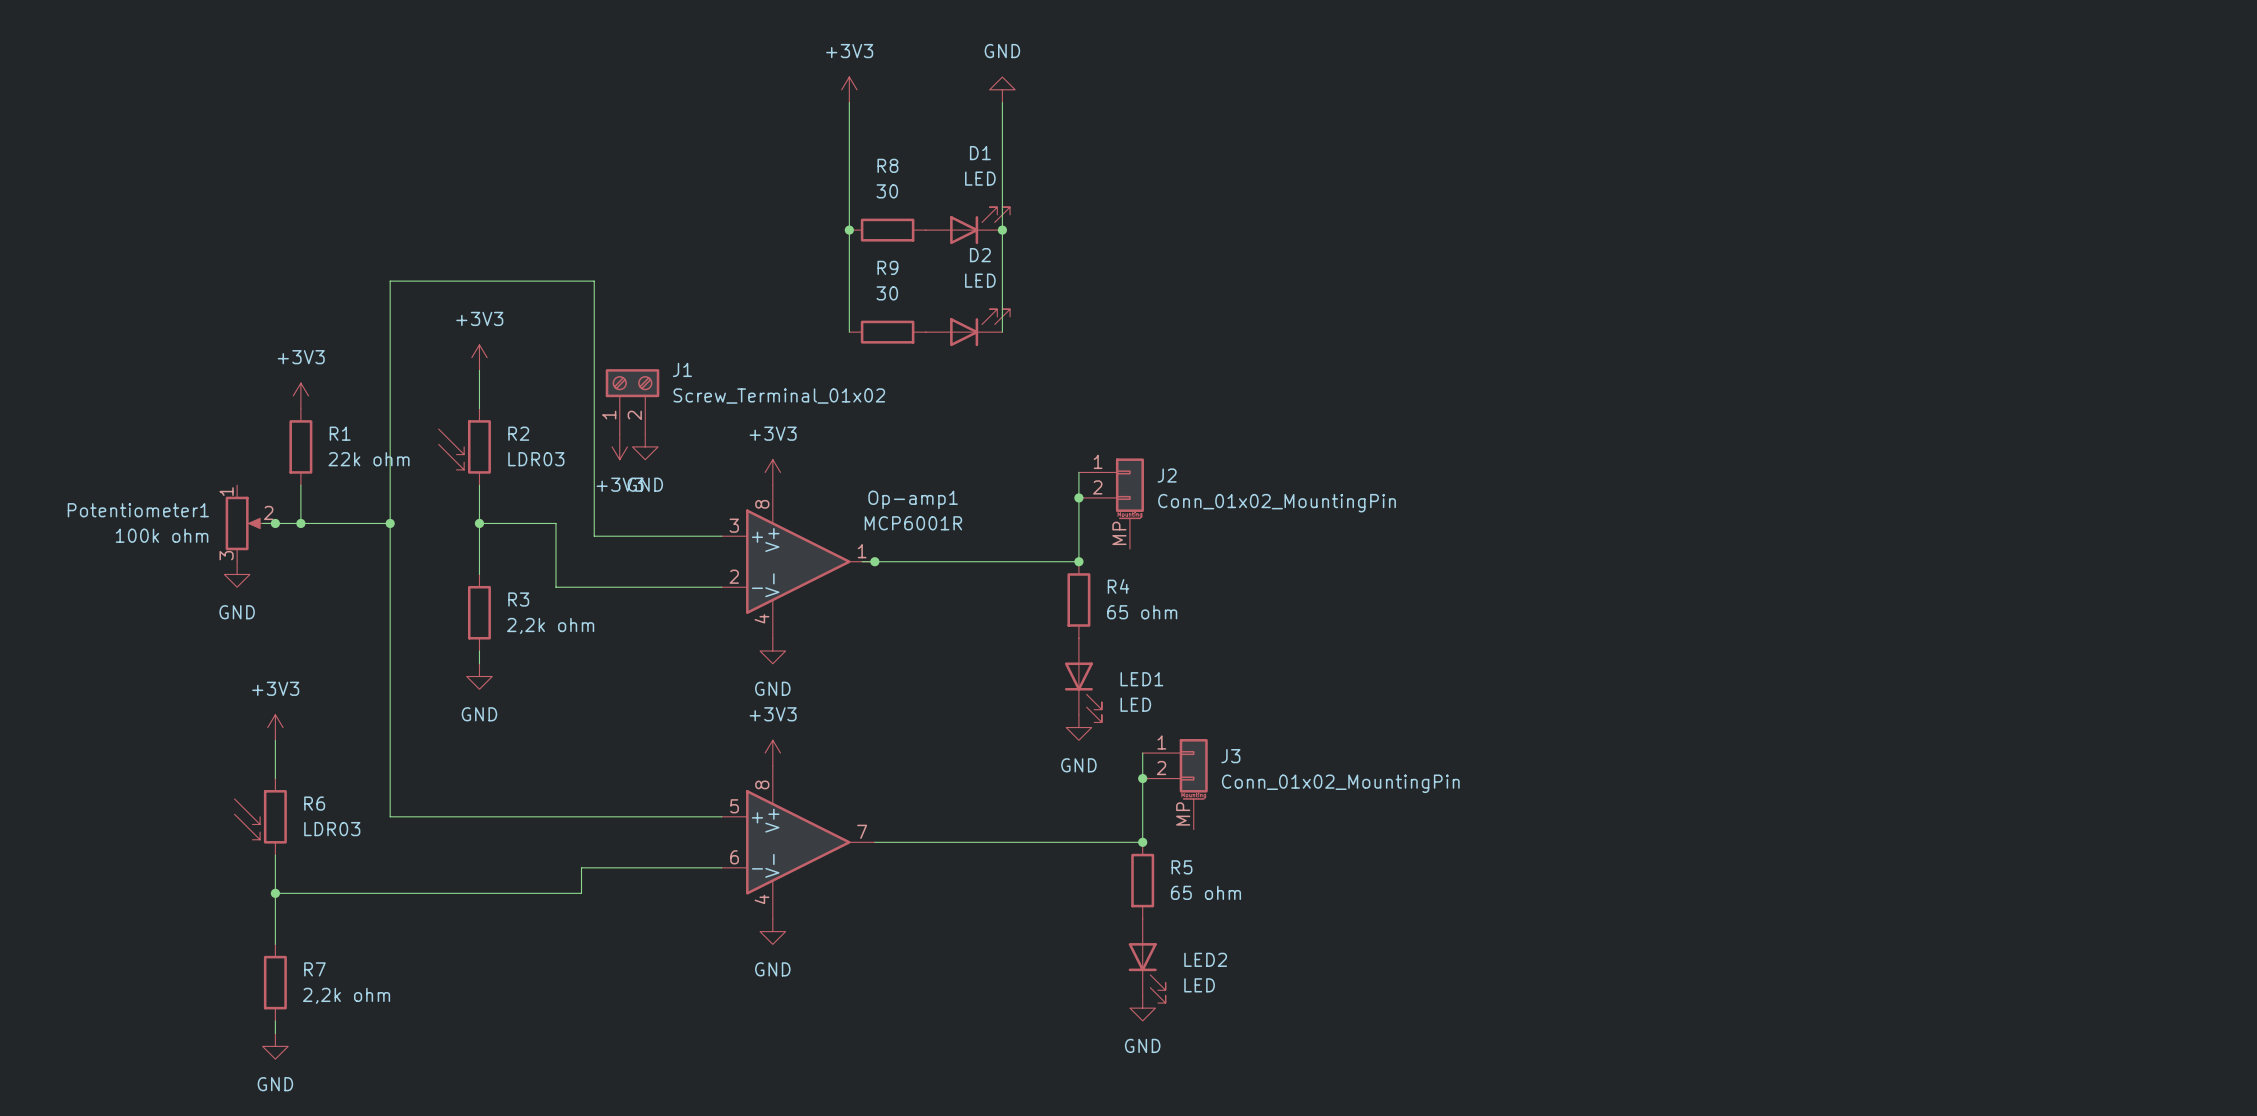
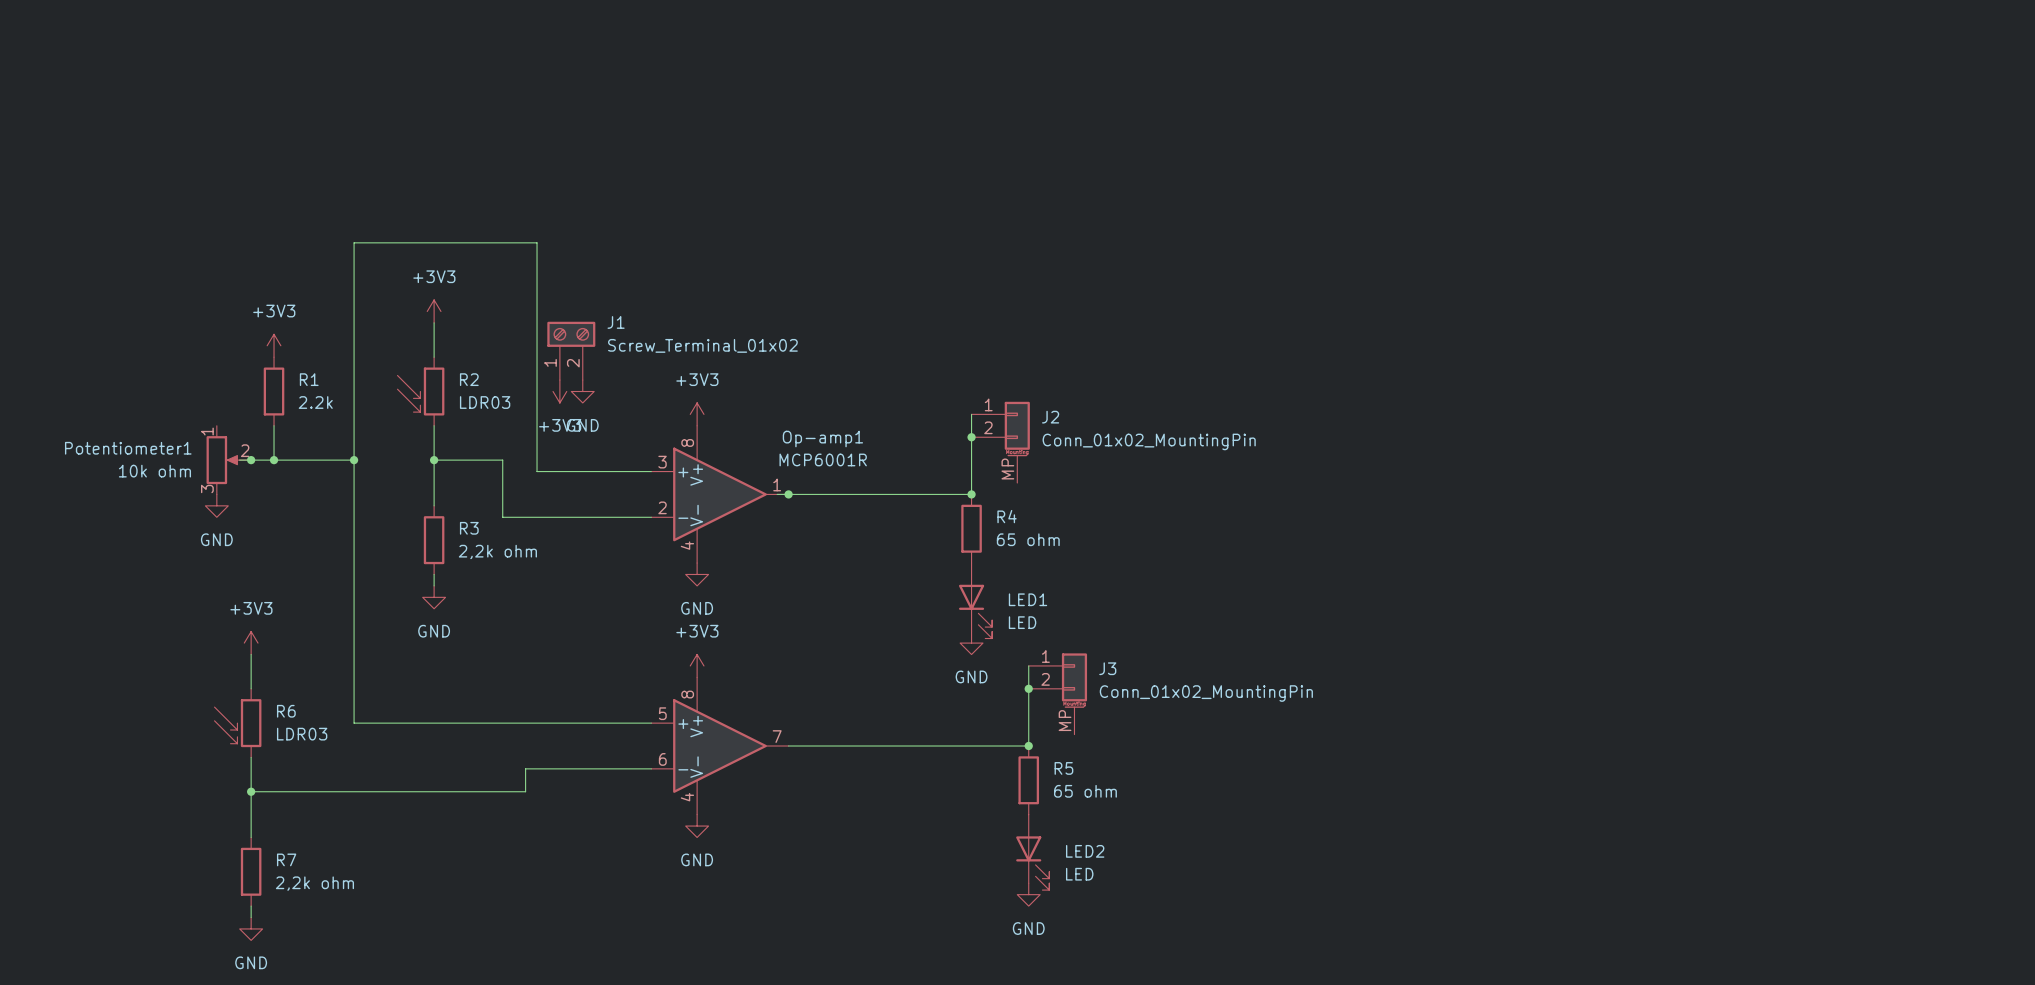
power symbol: +3V3 (849, 89) -> none
power symbol: GND (1002, 89) -> none
wire: (849, 102) (849, 332) -> none
wire: (1002, 102) (1002, 332) -> none
D1: LED (967, 225) -> none
junction: (849, 230) -> none
R8: 30 (887, 230) -> none
junction: (1002, 230) -> none
D2: LED (967, 327) -> none
R9: 30 (887, 332) -> none
R1 value: 22k ohm (369, 459) -> 2.2k (315, 402)
Potentiometer1 value: 100k ohm (162, 535) -> 10k ohm (154, 471)

